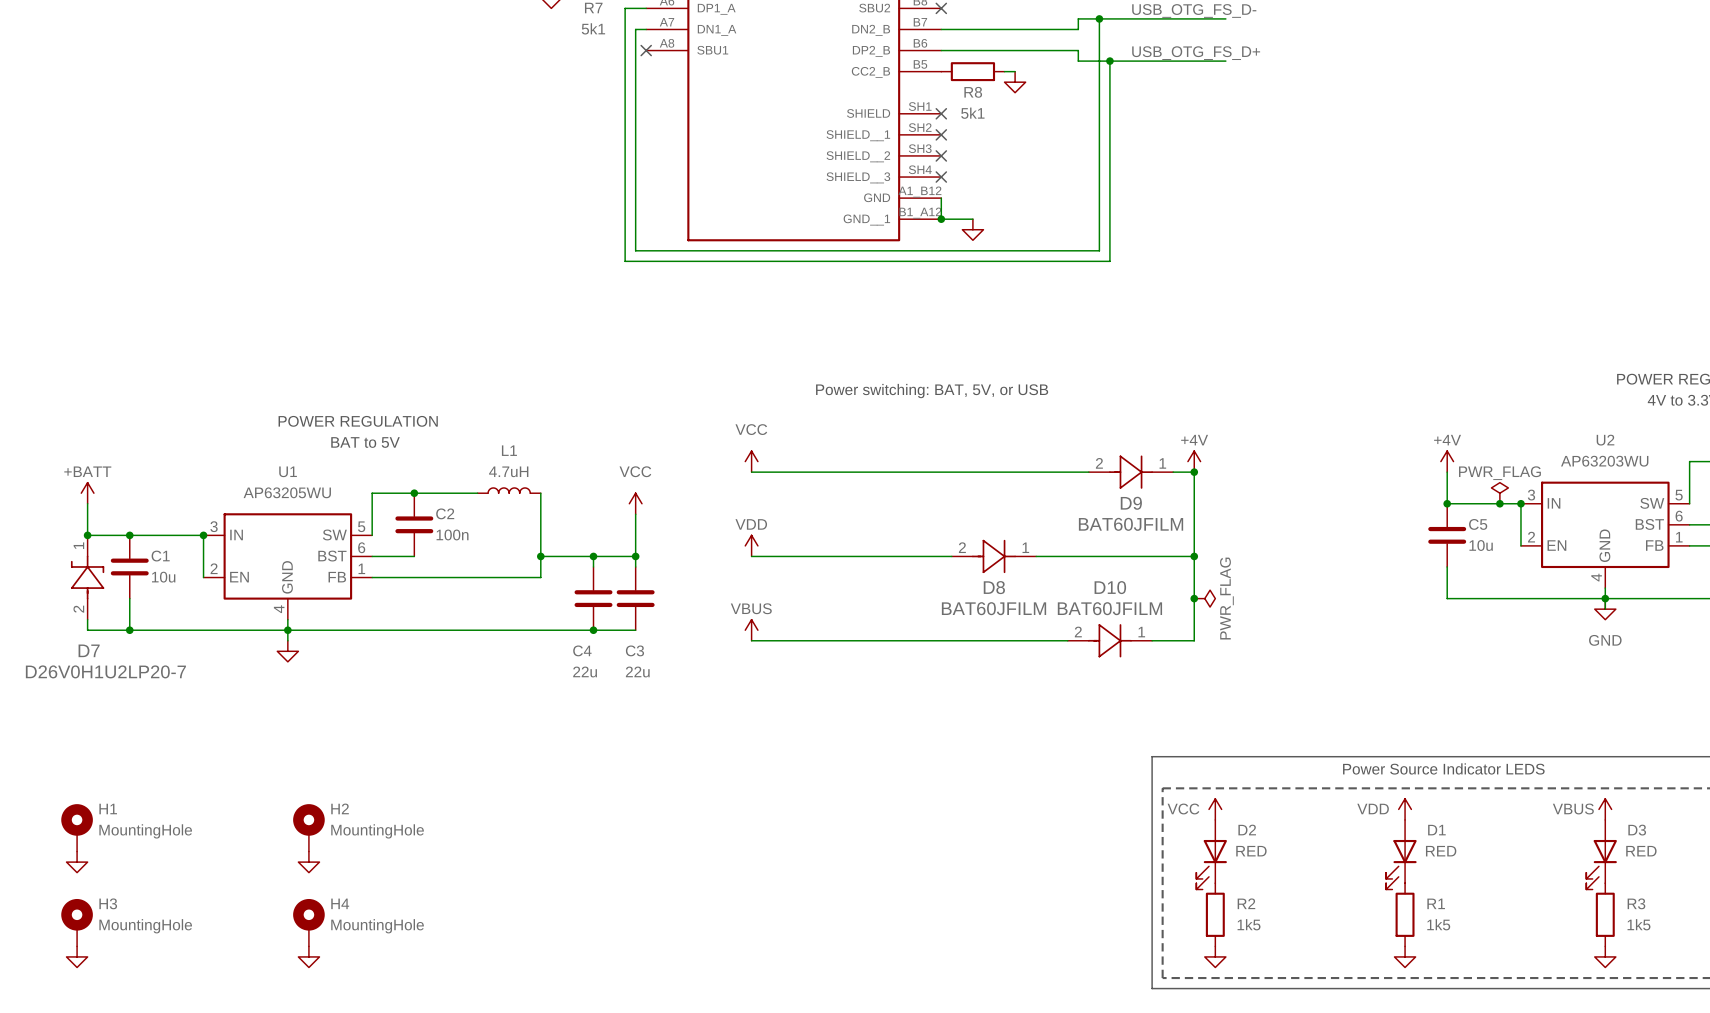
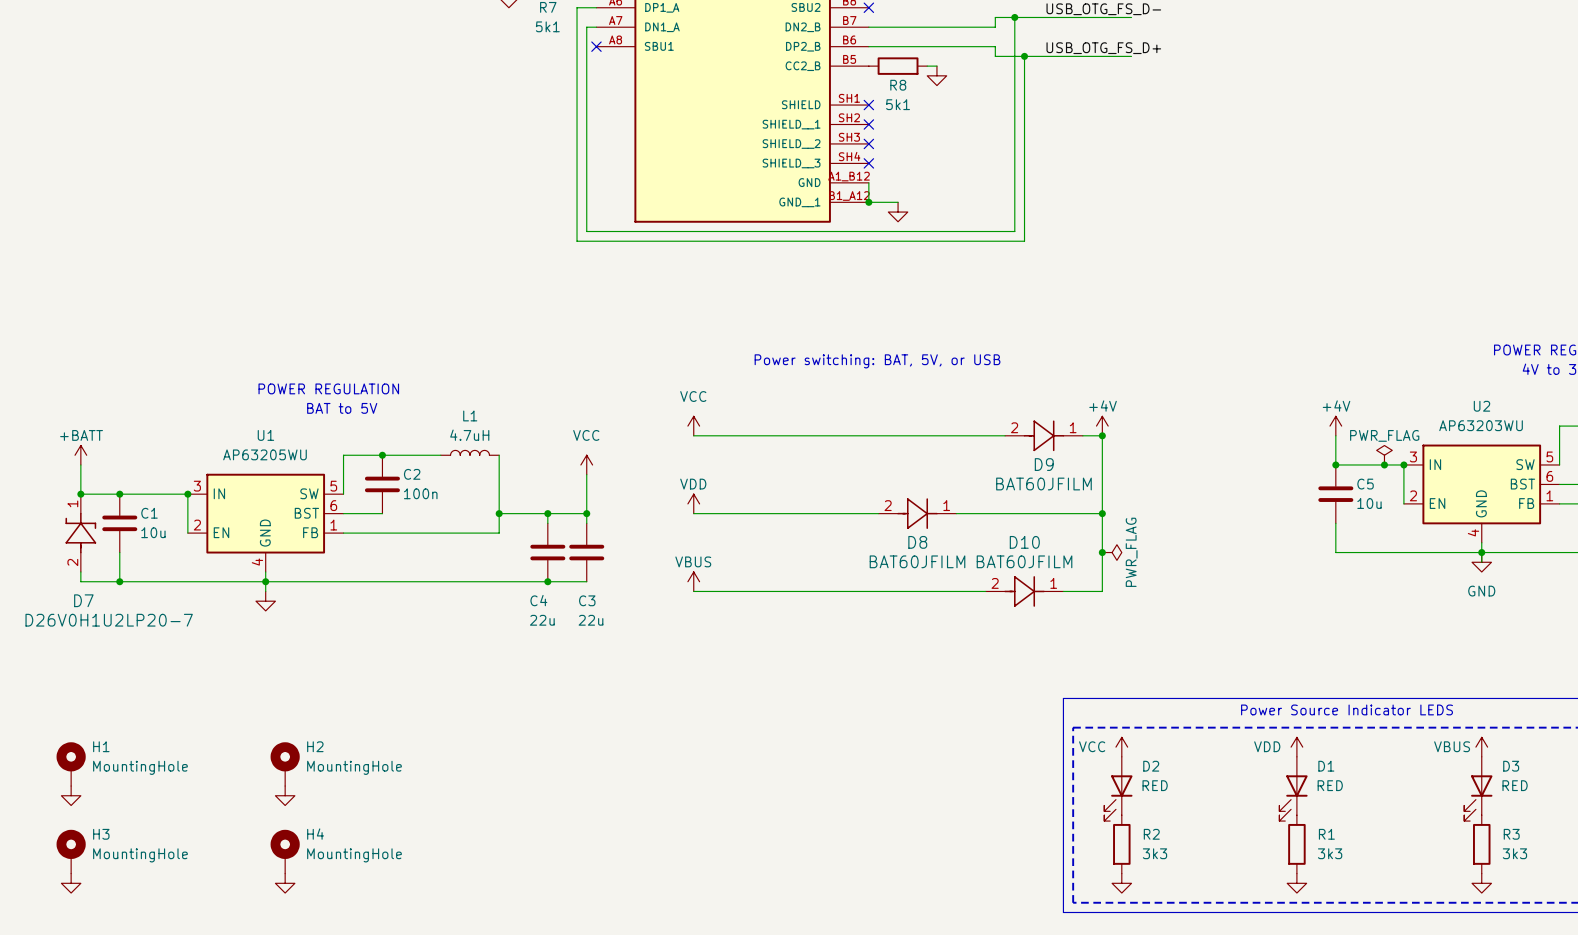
R2 value: 1k5 (1249, 924) -> 3k3 (1155, 853)
R1 value: 1k5 (1438, 924) -> 3k3 (1330, 853)
R3 value: 1k5 (1638, 924) -> 3k3 (1514, 853)

